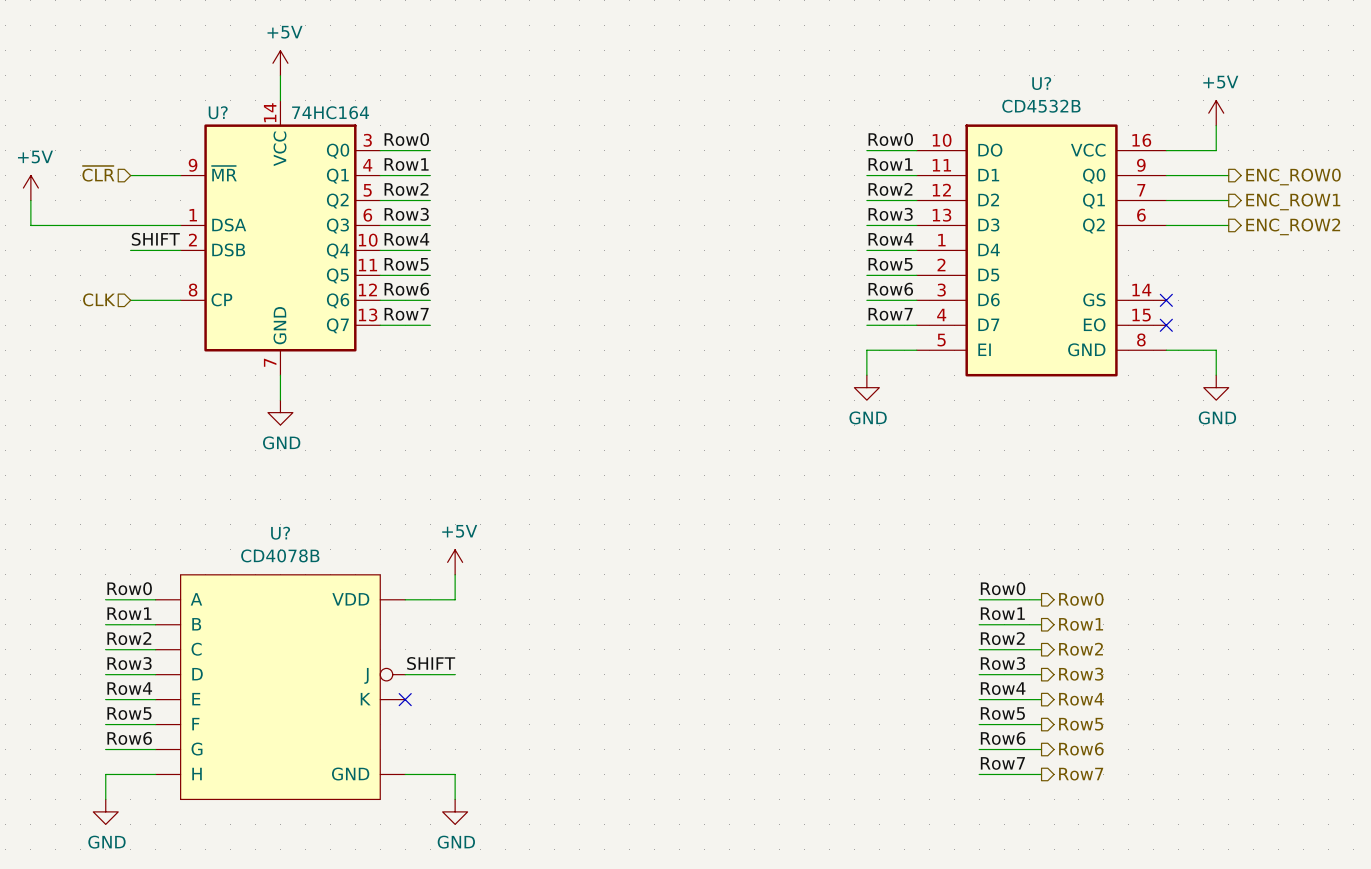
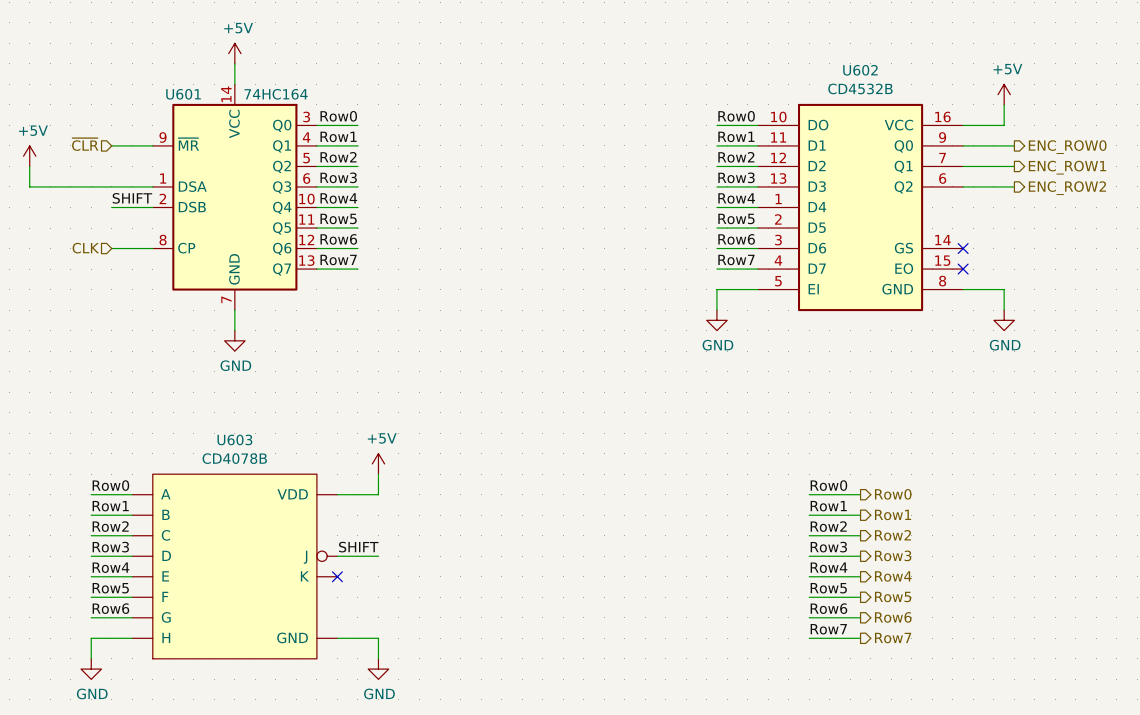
U? name: U? (1041, 83) -> U602 (860, 70)
U? name: U? (218, 112) -> U601 (183, 94)
U? name: U? (280, 533) -> U603 (234, 439)

